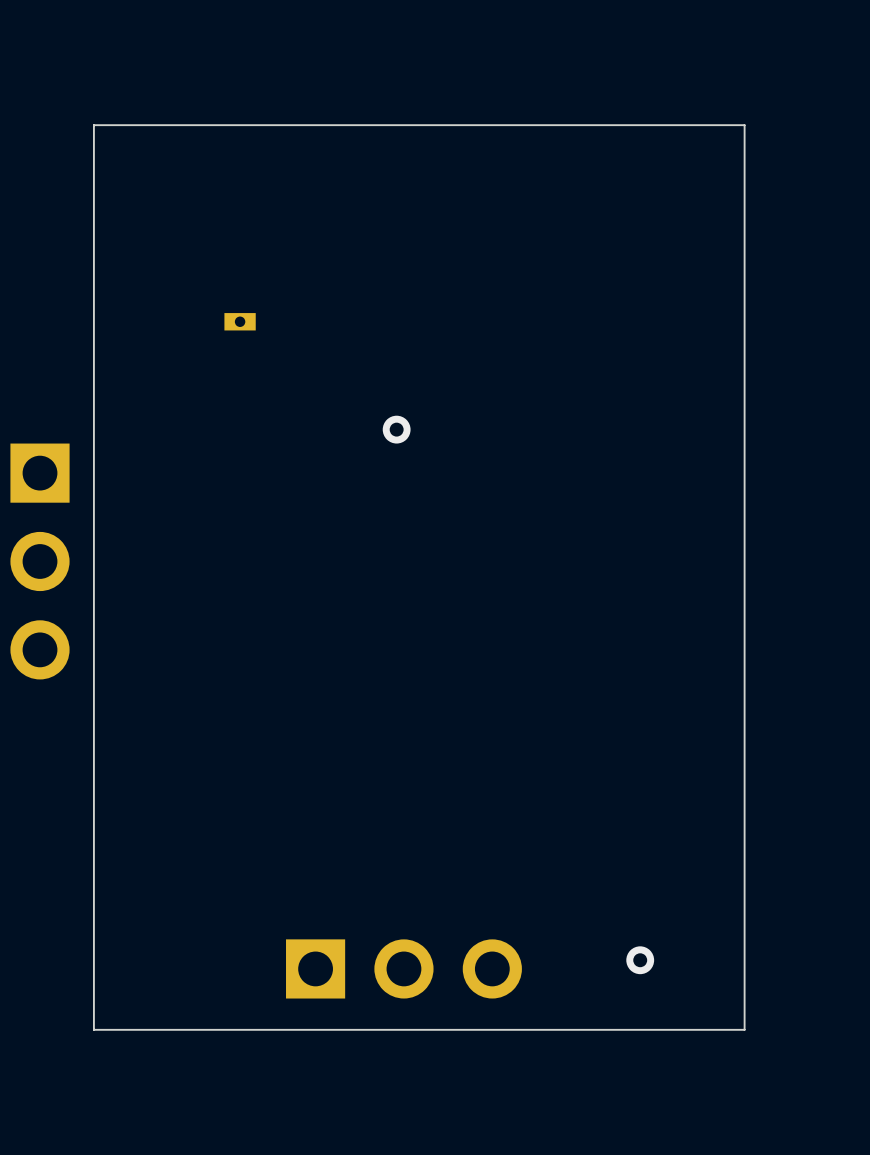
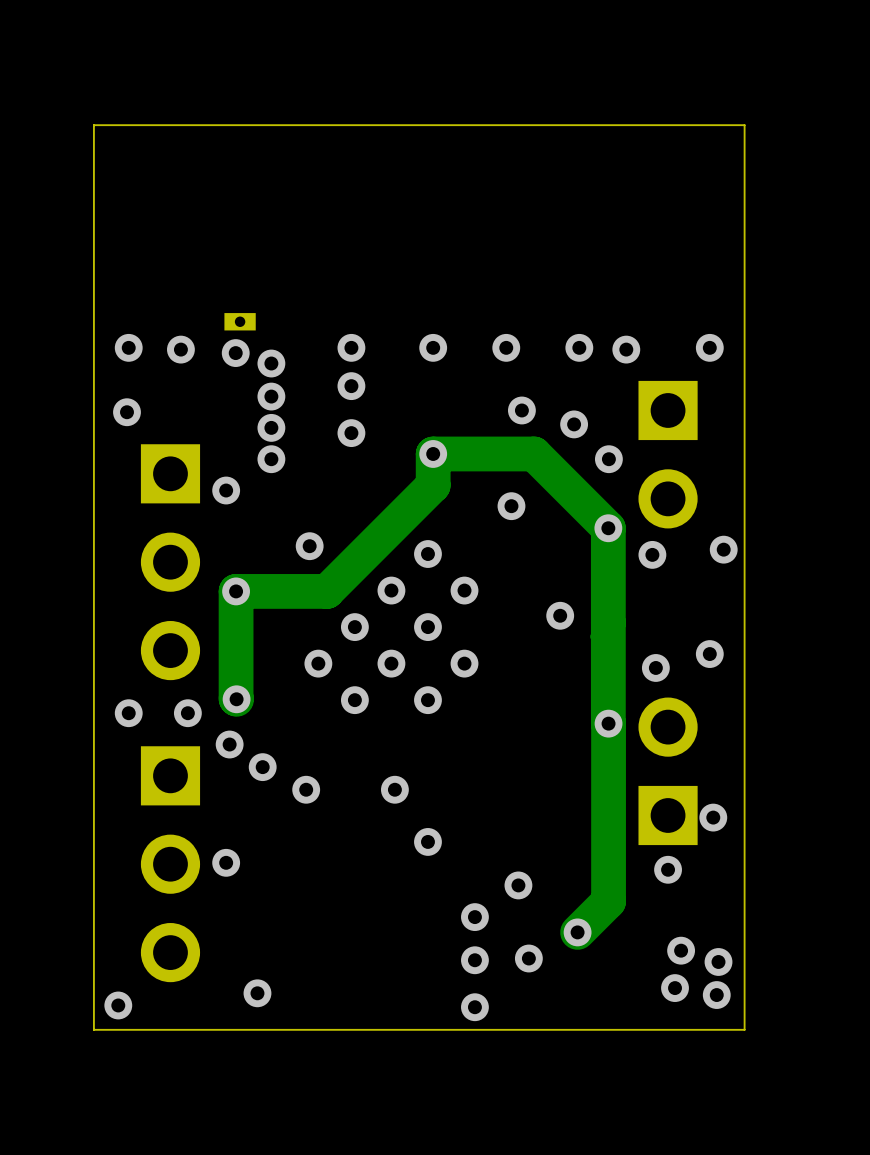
via: none -> (128, 347)
via: none -> (351, 347)
via: none -> (433, 347)
via: none -> (506, 347)
via: none -> (579, 347)
via: none -> (709, 347)
via: none -> (180, 349)
via: none -> (626, 349)
via: none -> (235, 353)
via: none -> (271, 363)
via: none -> (351, 386)
via: none -> (271, 396)
via: none -> (521, 410)
via: none -> (126, 412)
via: none -> (574, 424)
via: none -> (271, 427)
via: (396, 429) -> none
via: none -> (351, 433)
via: none -> (433, 453)
part: none -> (668, 454)
via: none -> (271, 459)
via: none -> (608, 459)
via: none -> (226, 490)
via: none -> (511, 506)
via: none -> (608, 528)
via: none -> (309, 546)
via: none -> (723, 549)
via: none -> (427, 554)
via: none -> (652, 554)
part position: (40, 561) -> (170, 562)
via: none -> (391, 590)
via: none -> (464, 590)
via: none -> (236, 591)
via: none -> (560, 615)
via: none -> (354, 627)
via: none -> (427, 627)
via: none -> (709, 654)
via: none -> (318, 663)
via: none -> (391, 663)
via: none -> (464, 663)
via: none -> (655, 667)
via: none -> (236, 699)
track: none -> (248, 699) (236, 698) (236, 591) (327, 591) (433, 485) (433, 453) (534, 453) (608, 528) (608, 723)
via: none -> (354, 700)
via: none -> (427, 700)
via: none -> (128, 713)
via: none -> (187, 713)
track: none -> (608, 723) (608, 901) (577, 932)
via: none -> (608, 723)
via: none -> (229, 744)
via: none -> (262, 767)
part: none -> (668, 771)
via: none -> (306, 789)
via: none -> (394, 789)
via: none -> (713, 817)
via: none -> (427, 841)
via: none -> (226, 862)
part: none -> (170, 864)
via: none -> (668, 869)
via: none -> (518, 885)
via: none -> (474, 917)
via: none -> (577, 932)
via: none -> (681, 950)
via: none -> (528, 958)
via: none -> (474, 960)
via: (640, 960) -> none
via: none -> (718, 961)
part: (403, 968) -> none
via: none -> (675, 988)
via: none -> (257, 993)
via: none -> (716, 995)
via: none -> (118, 1005)
via: none -> (474, 1007)

